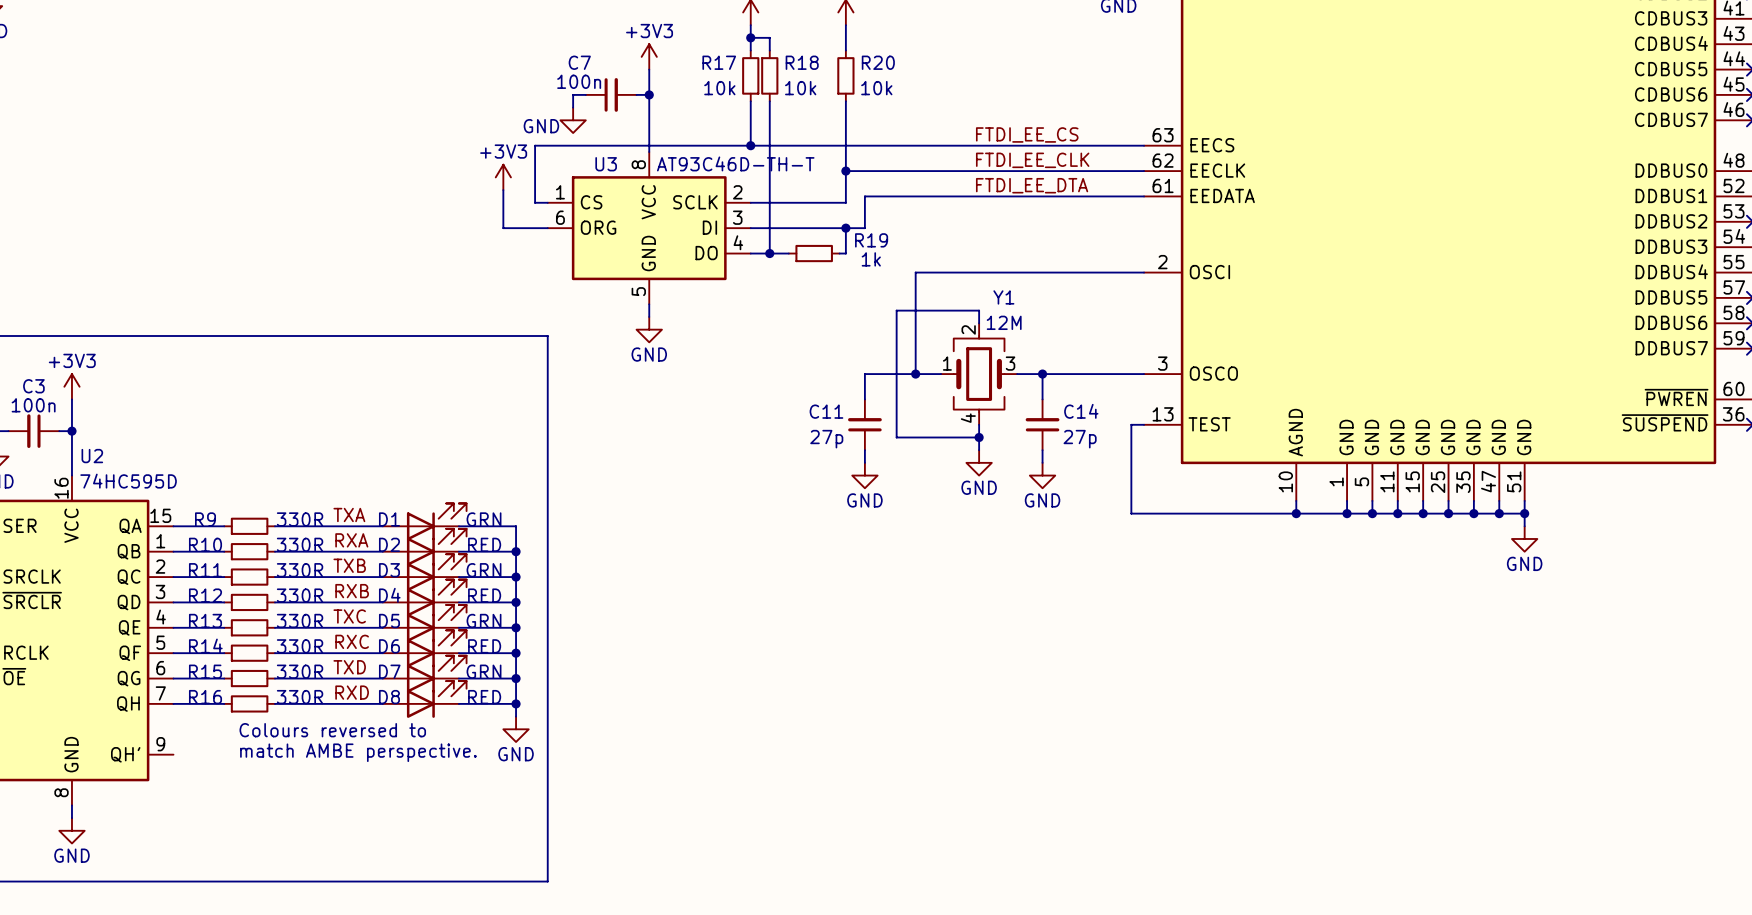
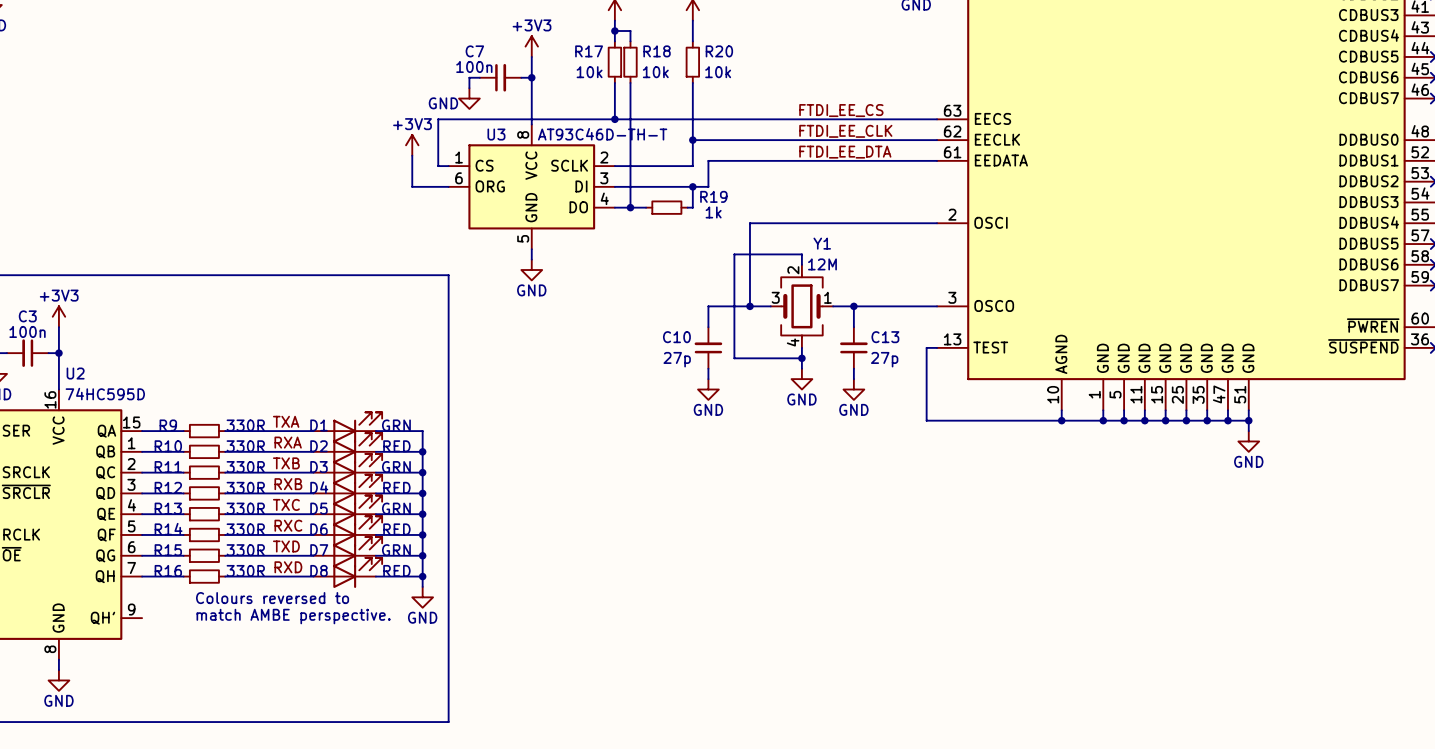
Y1 flip: as is (979, 374) -> left-right (801, 306)
C11 name: C11 (826, 411) -> C10 (676, 337)
C14 name: C14 (1081, 411) -> C13 (885, 337)

